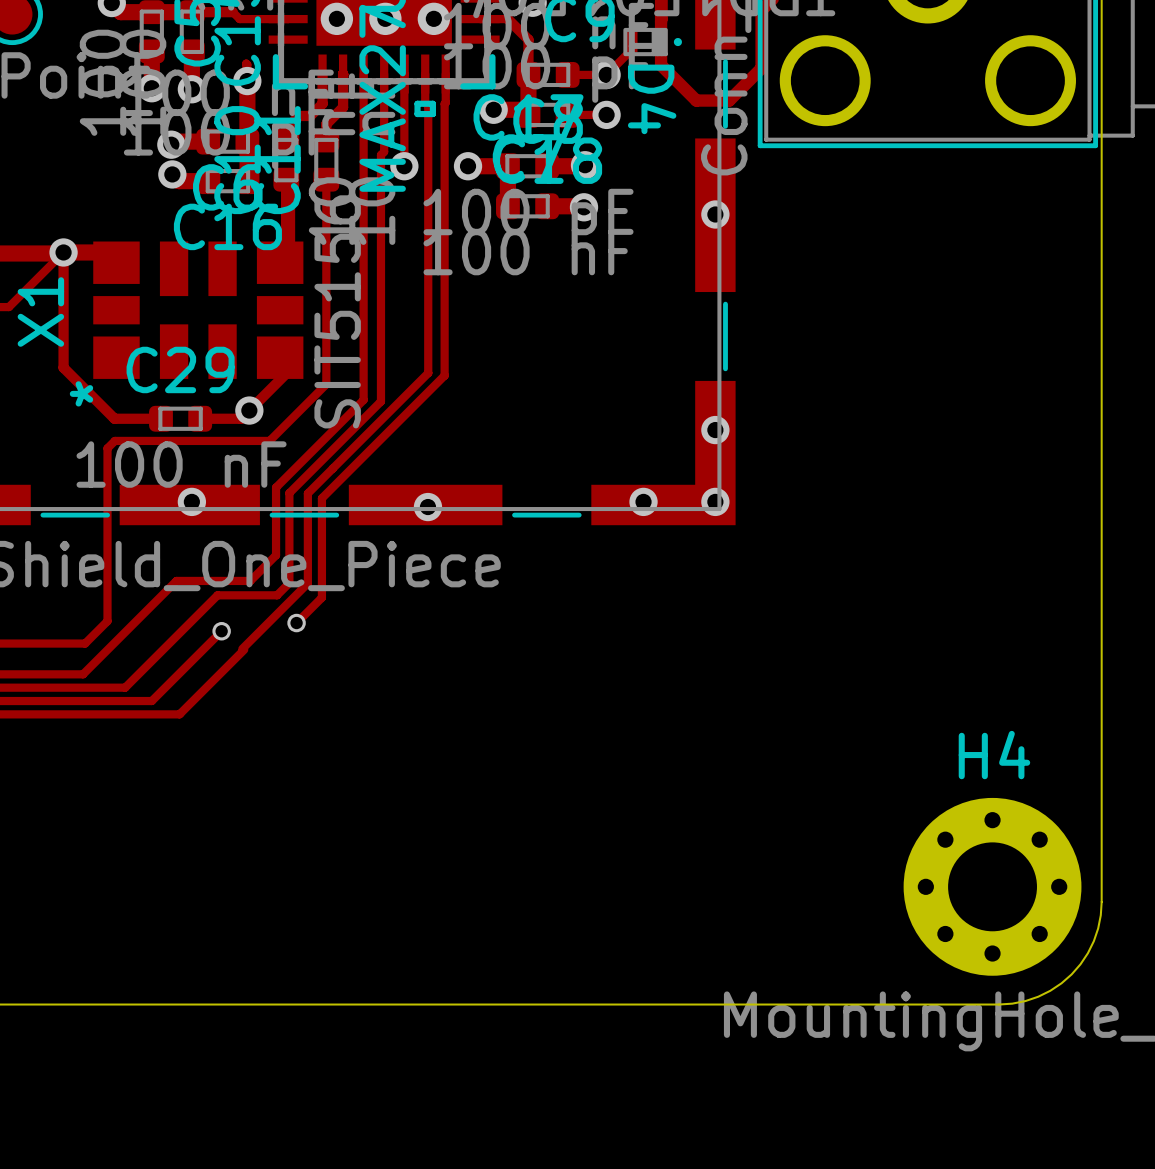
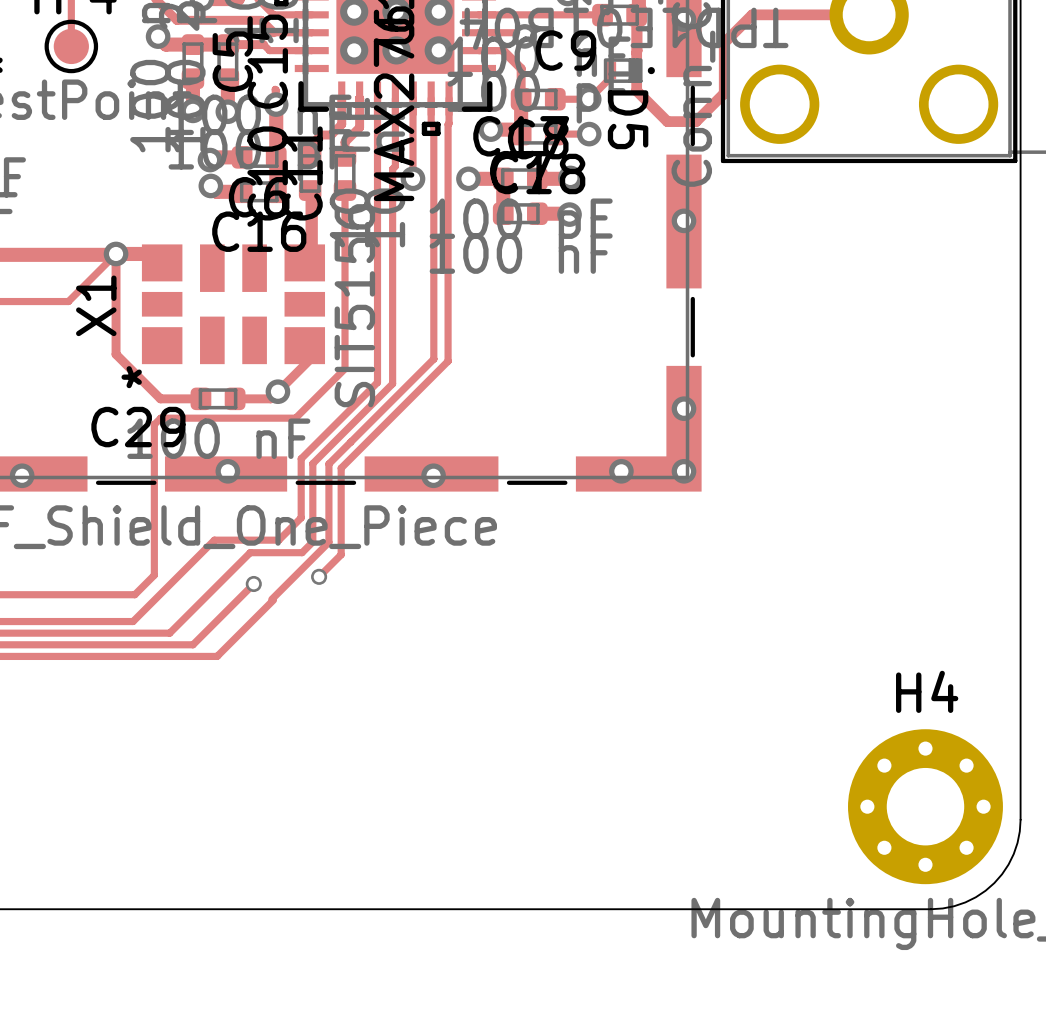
D4 name: D4 (652, 99) -> D5 (628, 119)
C29 name position: C29 (180, 369) -> C29 (138, 427)

